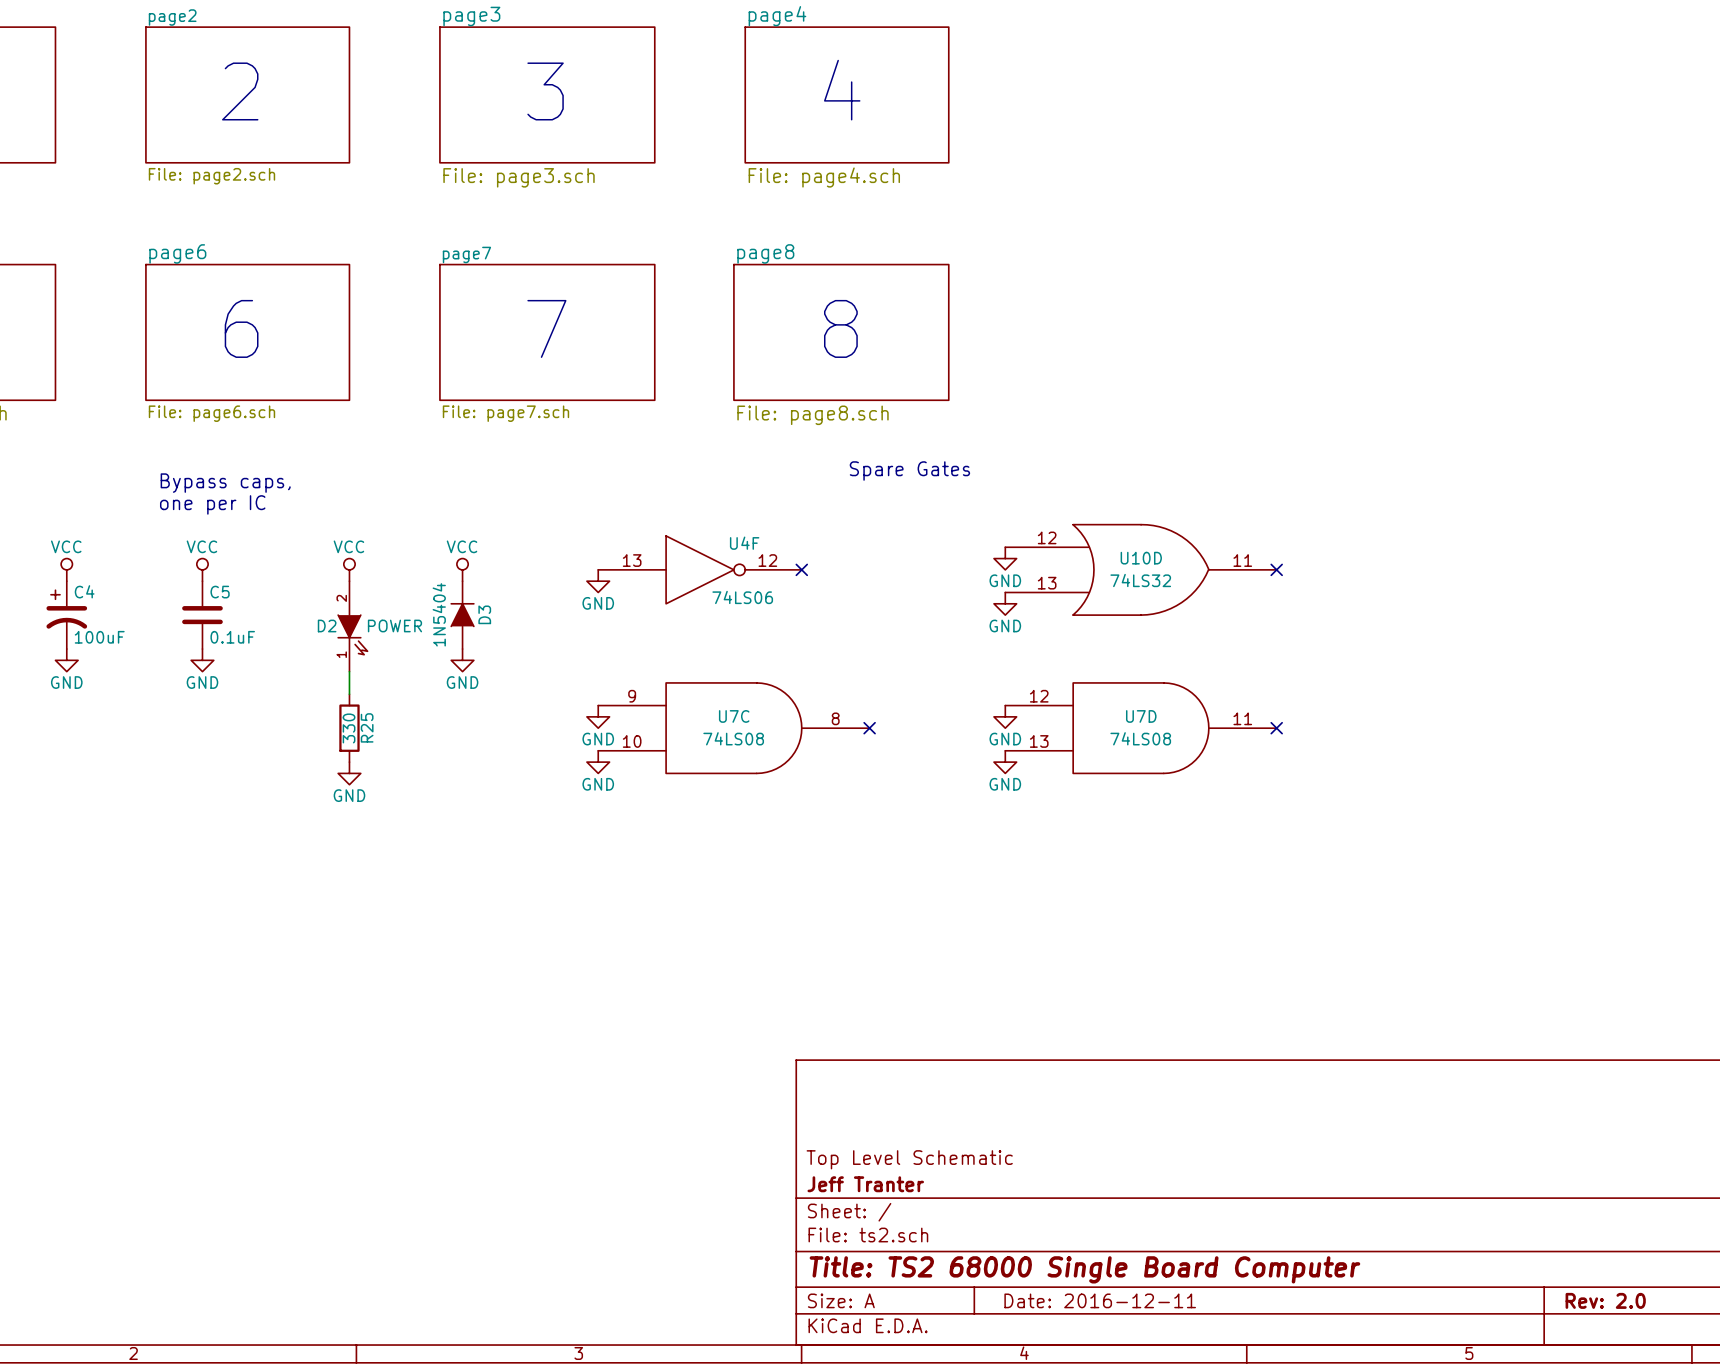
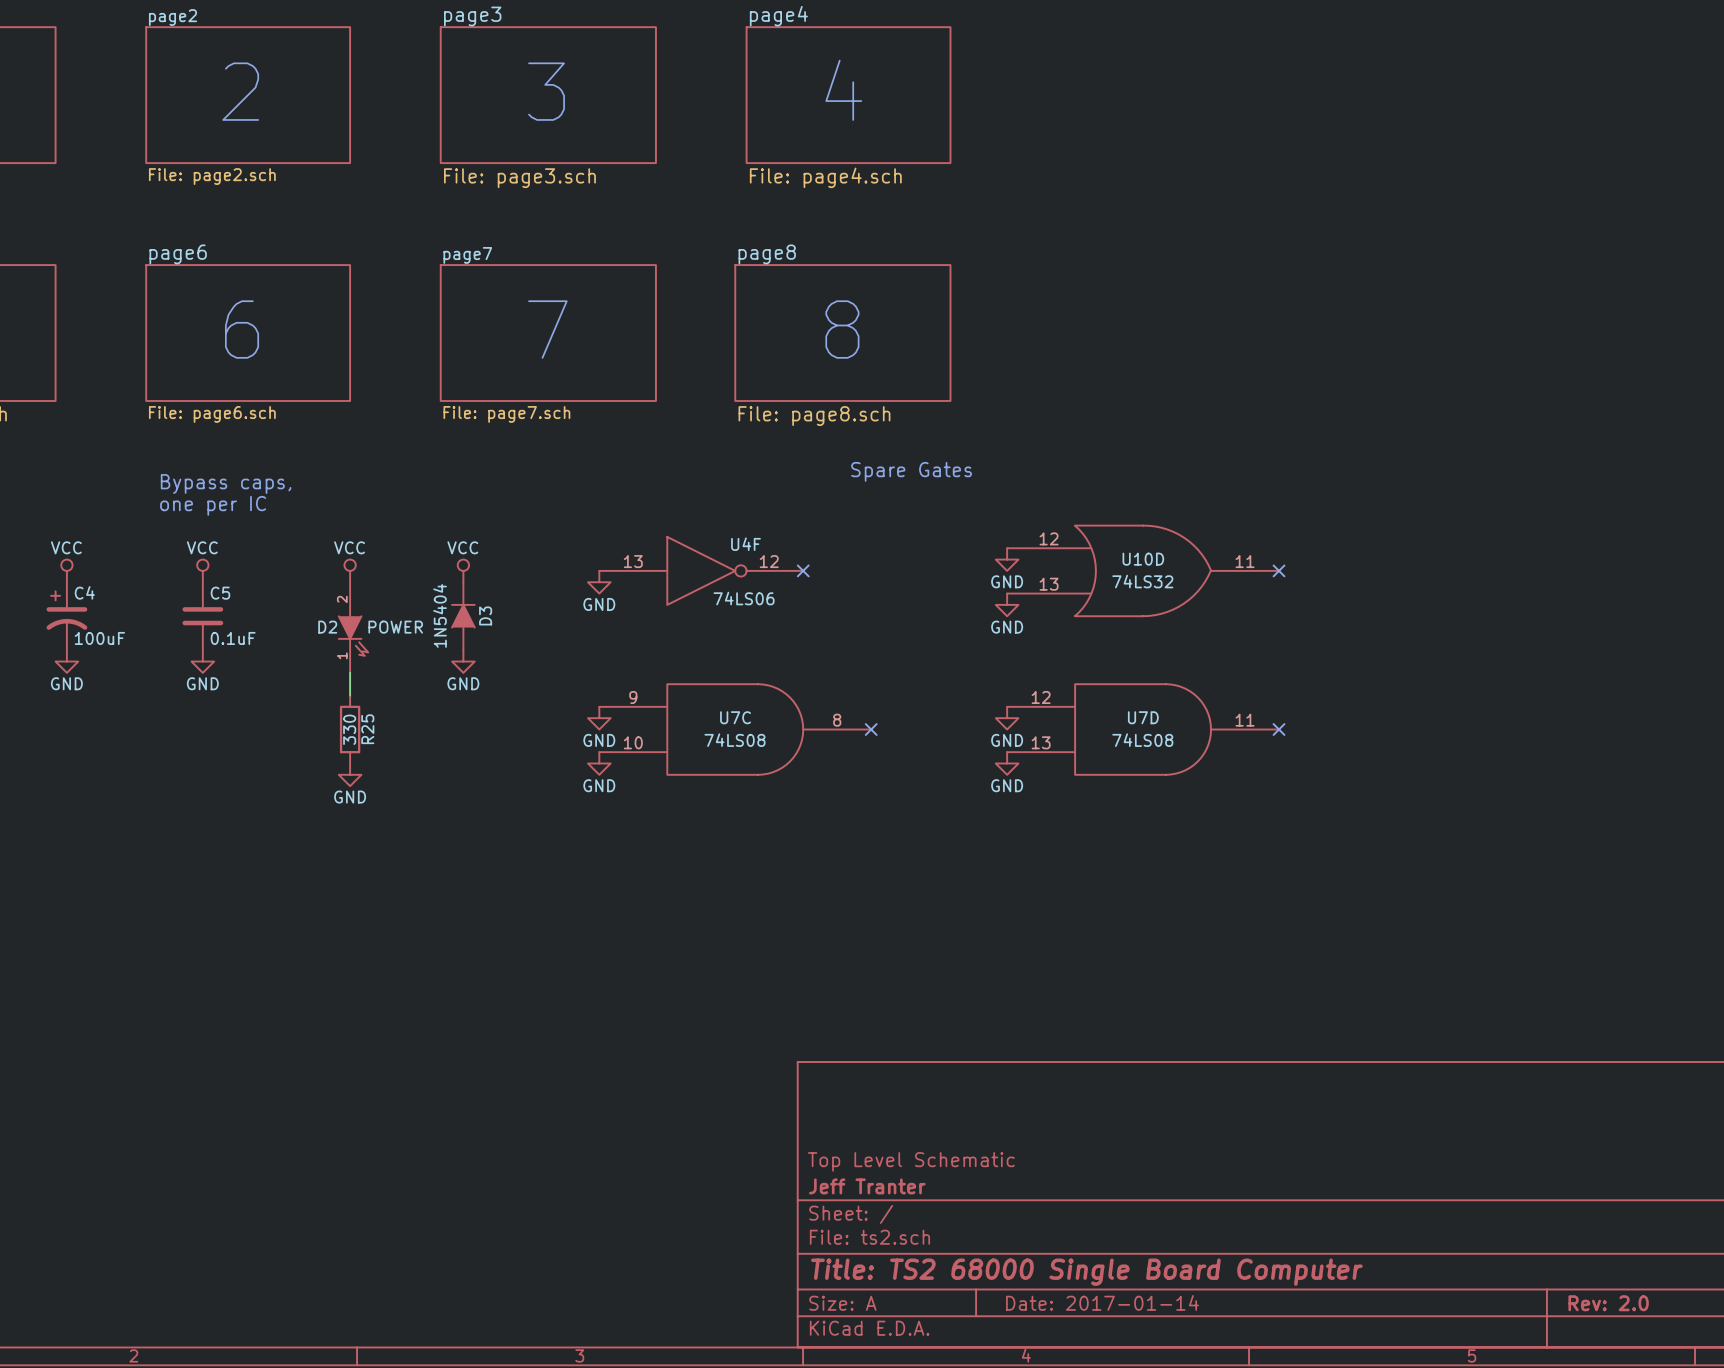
title block: Date: 2016-12-11 (1100, 1300) -> Date: 2017-01-14 (1102, 1302)

